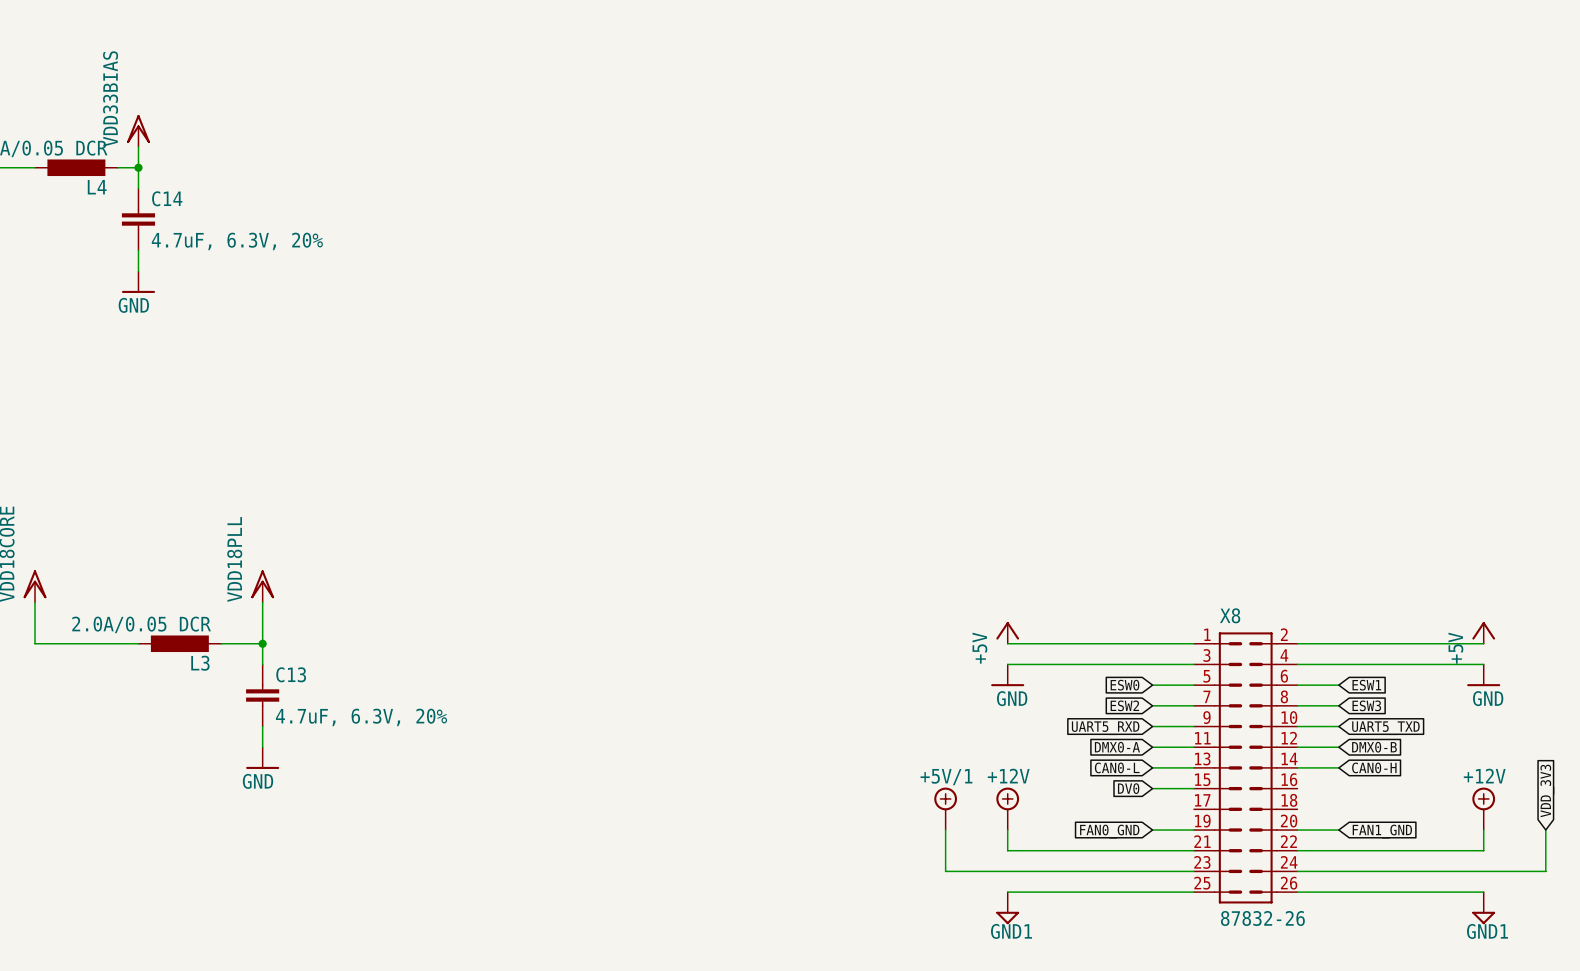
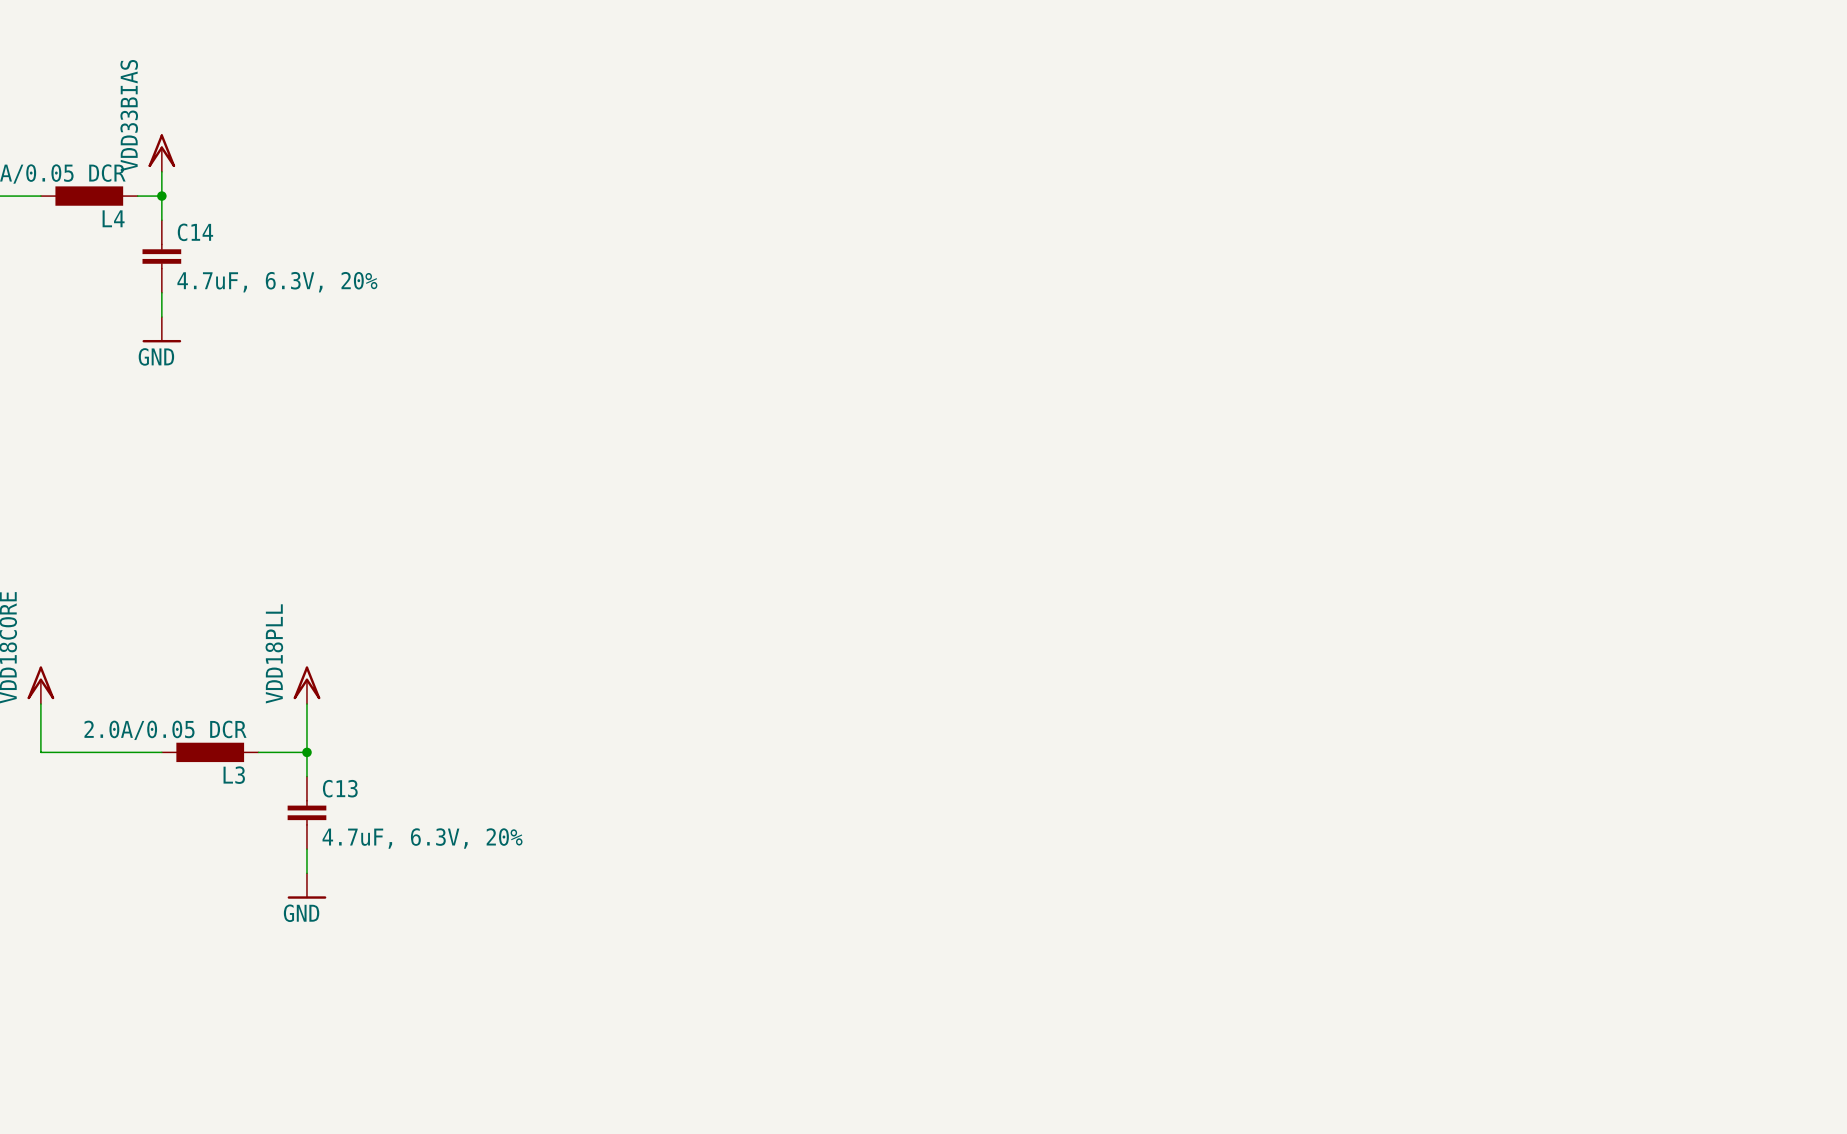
power symbol: +5V (1007, 632) -> none
power symbol: +5V (1483, 632) -> none
wire: (1007, 643) (1193, 643) -> none
wire: (1297, 643) (1483, 643) -> none
wire: (1007, 664) (1193, 664) -> none
wire: (1297, 664) (1483, 664) -> none
power symbol: GND (1007, 675) -> none
power symbol: GND (1483, 675) -> none
global label: ESW0 (1124, 685) -> none
wire: (1152, 685) (1193, 685) -> none
wire: (1297, 685) (1338, 685) -> none
global label: ESW1 (1366, 685) -> none
global label: ESW2 (1124, 705) -> none
wire: (1152, 705) (1193, 705) -> none
wire: (1297, 705) (1338, 705) -> none
global label: ESW3 (1366, 705) -> none
wire: (1152, 726) (1193, 726) -> none
wire: (1297, 726) (1338, 726) -> none
global label: UART5_RXD (1105, 728) -> none
global label: UART5_TXD (1385, 728) -> none
global label: DMX0-A (1117, 747) -> none
wire: (1152, 747) (1193, 747) -> none
wire: (1297, 747) (1338, 747) -> none
global label: DMX0-B (1374, 747) -> none
global label: CAN0-L (1117, 767) -> none
wire: (1152, 767) (1193, 767) -> none
X8: 87832-26 (1245, 767) -> none
wire: (1297, 767) (1338, 767) -> none
global label: CAN0-H (1374, 767) -> none
global label: DV0 (1128, 788) -> none
wire: (1152, 788) (1193, 788) -> none
global label: VDD_3V3 (1547, 790) -> none
power symbol: +5V/1 (945, 808) -> none
power symbol: +12V (1007, 808) -> none
power symbol: +12V (1483, 808) -> none
wire: (945, 830) (945, 871) (1193, 871) -> none
wire: (1007, 830) (1007, 850) (1193, 850) -> none
wire: (1152, 830) (1193, 830) -> none
wire: (1297, 830) (1338, 830) -> none
wire: (1483, 830) (1483, 850) (1297, 850) -> none
wire: (1545, 830) (1545, 871) (1297, 871) -> none
global label: FAN0_GND (1109, 831) -> none
global label: FAN1_GND (1382, 831) -> none
wire: (1007, 892) (1193, 892) -> none
wire: (1297, 892) (1483, 892) -> none
power symbol: GND1 (1007, 908) -> none
power symbol: GND1 (1483, 908) -> none

